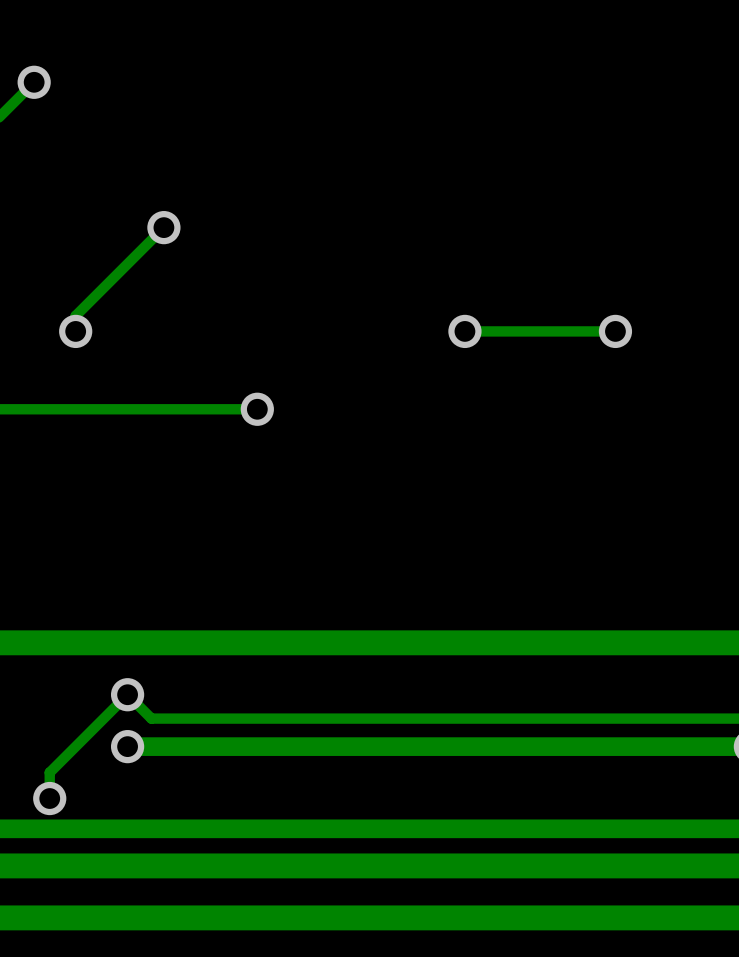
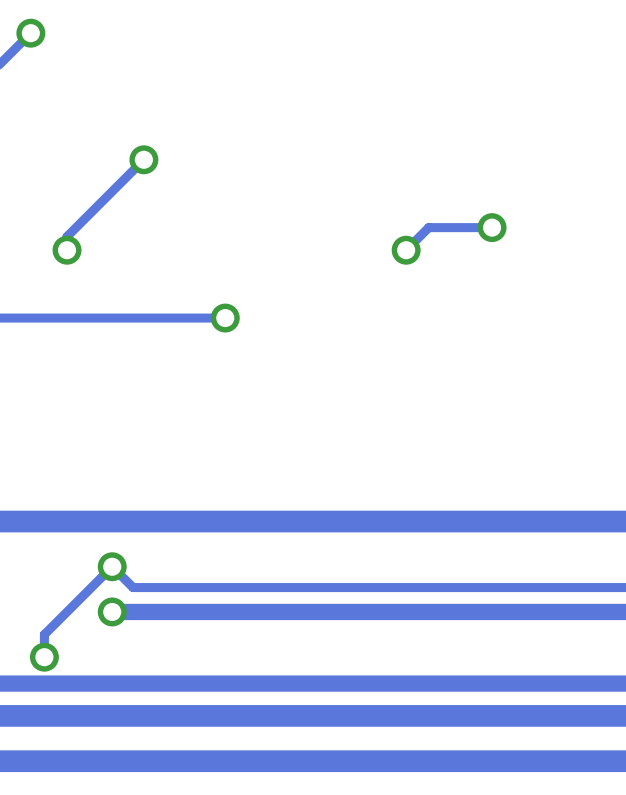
track: (615, 331) (464, 331) -> (492, 227) (428, 227) (406, 250)
via position: (615, 331) -> (492, 227)

